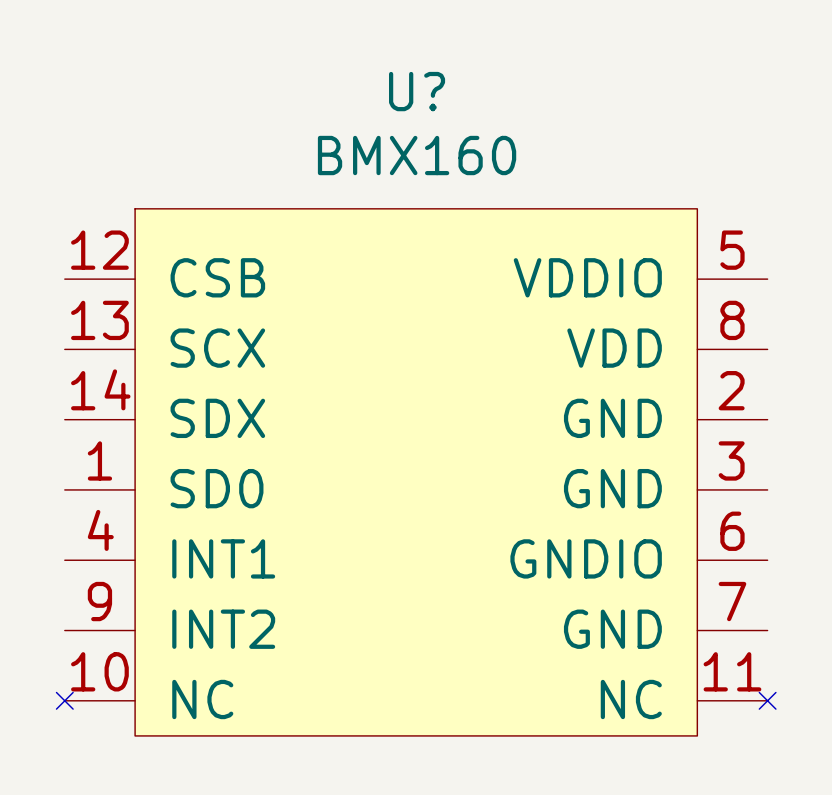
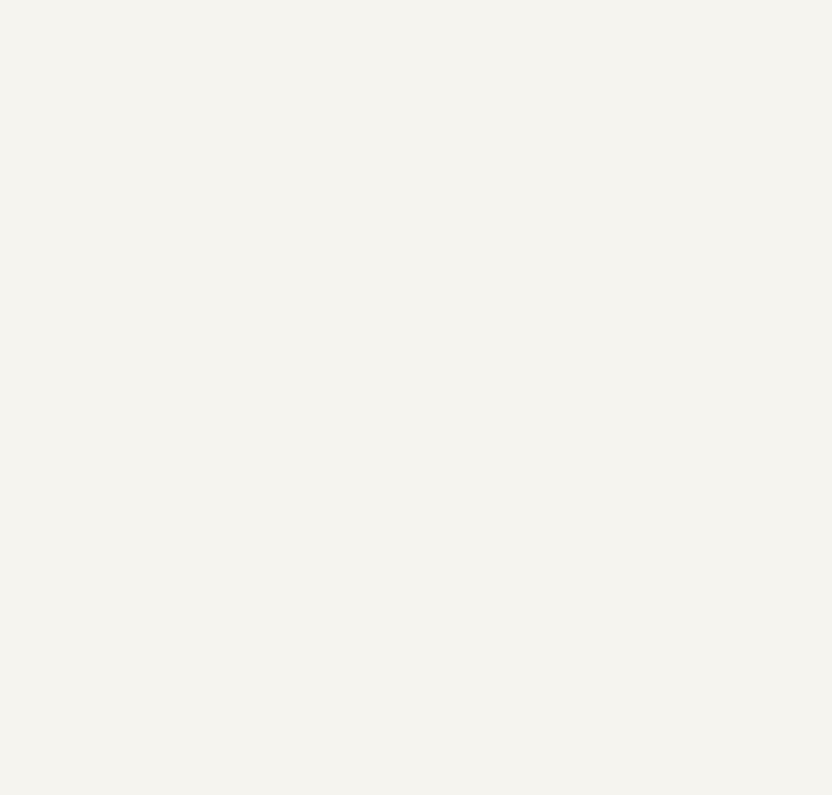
U?: BMX160 (416, 472) -> none

